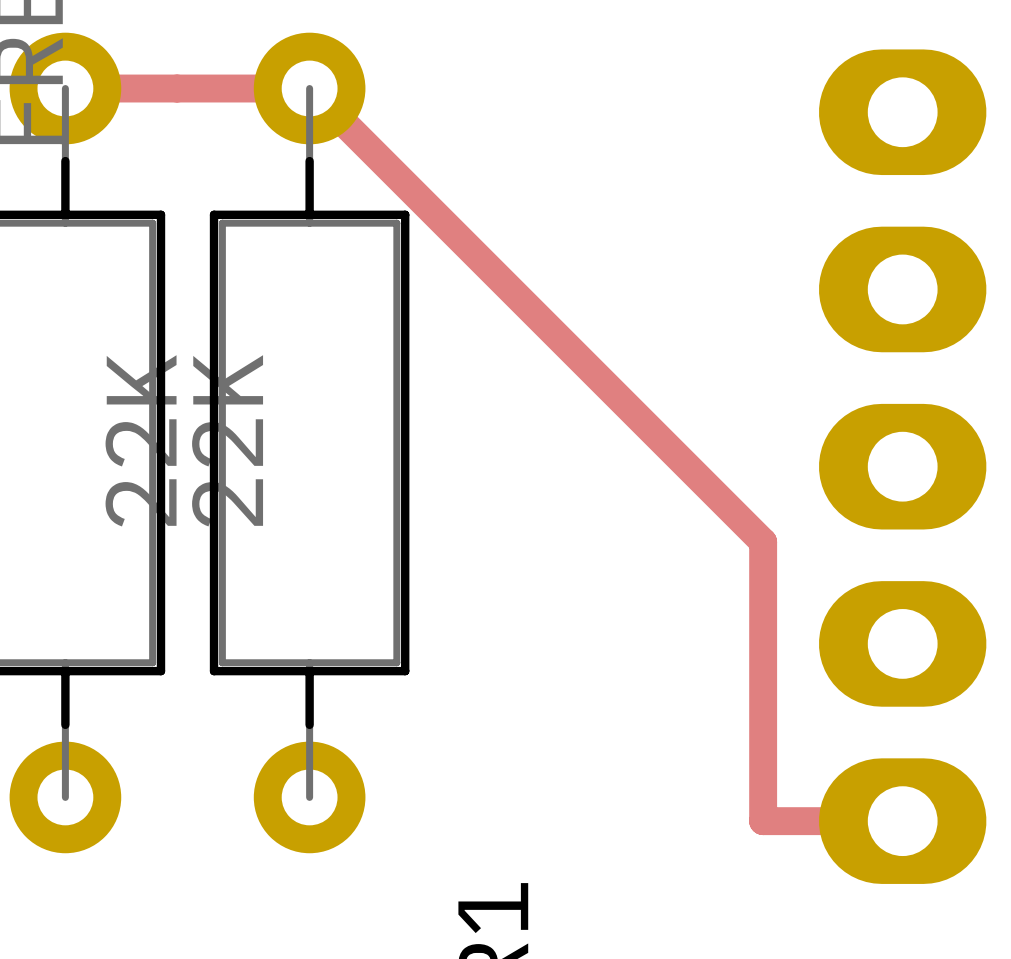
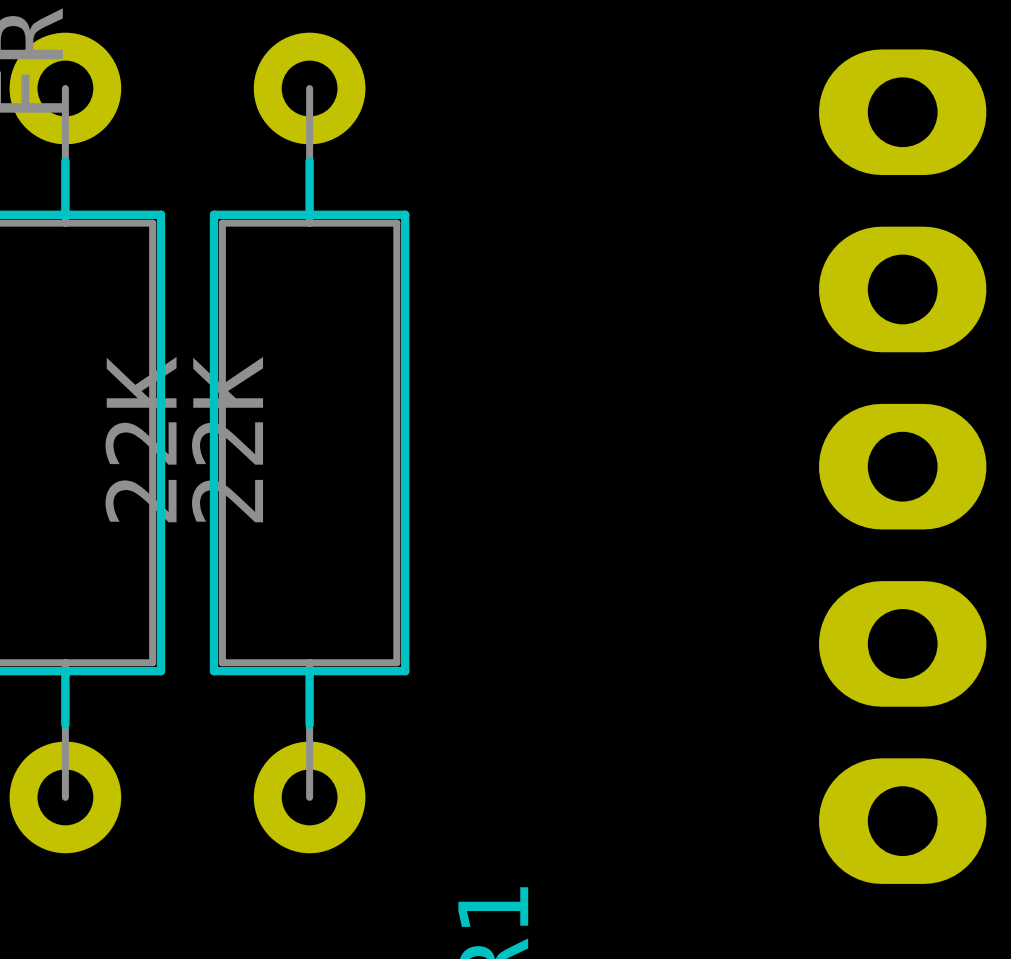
track: (65, 88) (309, 88) (763, 542) (763, 821) (902, 821) -> none

